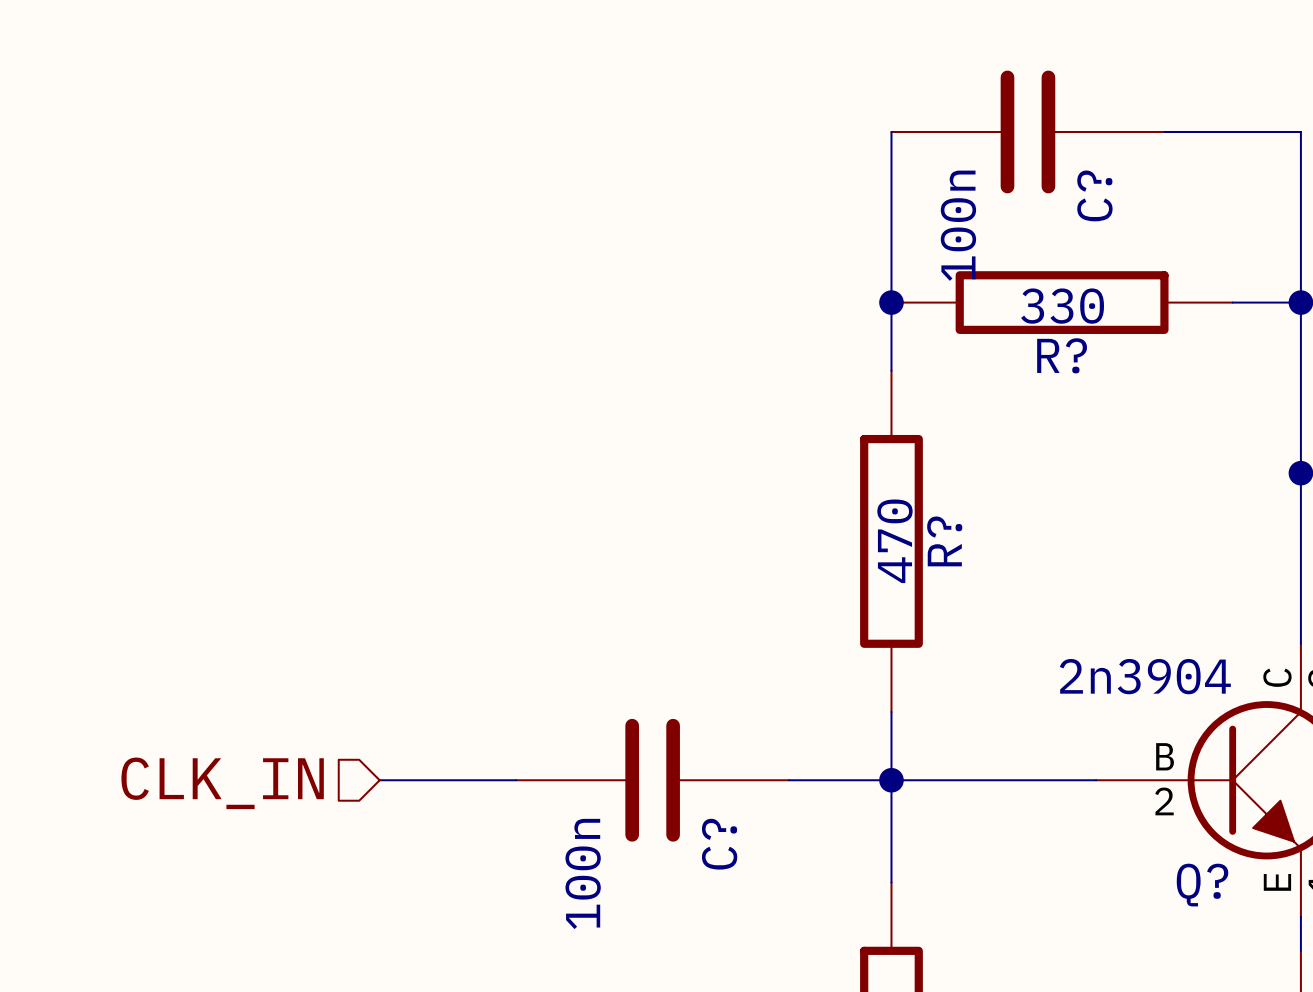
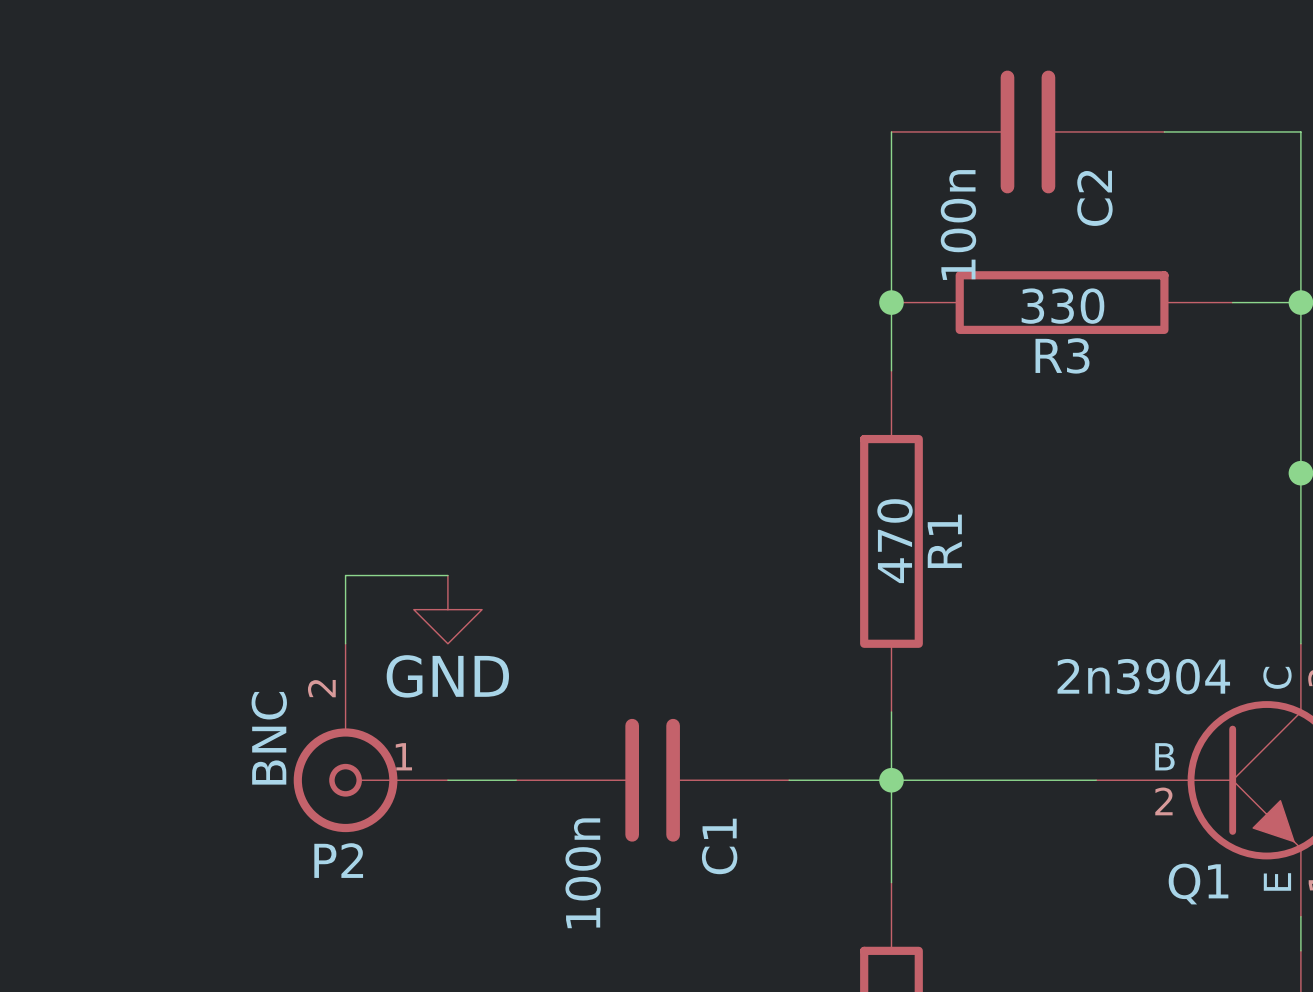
C? name: C? (1094, 195) -> C2 (1094, 198)
R? name: R? (1062, 355) -> R3 (1062, 355)
R? name: R? (944, 541) -> R1 (944, 541)
wire: none -> (447, 575) (345, 575) (345, 643)
power symbol: none -> GND (447, 609)
P2: none -> BNC (370, 737)
hierarchical label: CLK_IN (222, 783) -> none
C? name: C? (719, 844) -> C1 (719, 846)
Q? name: Q? (1202, 885) -> Q1 (1198, 884)

